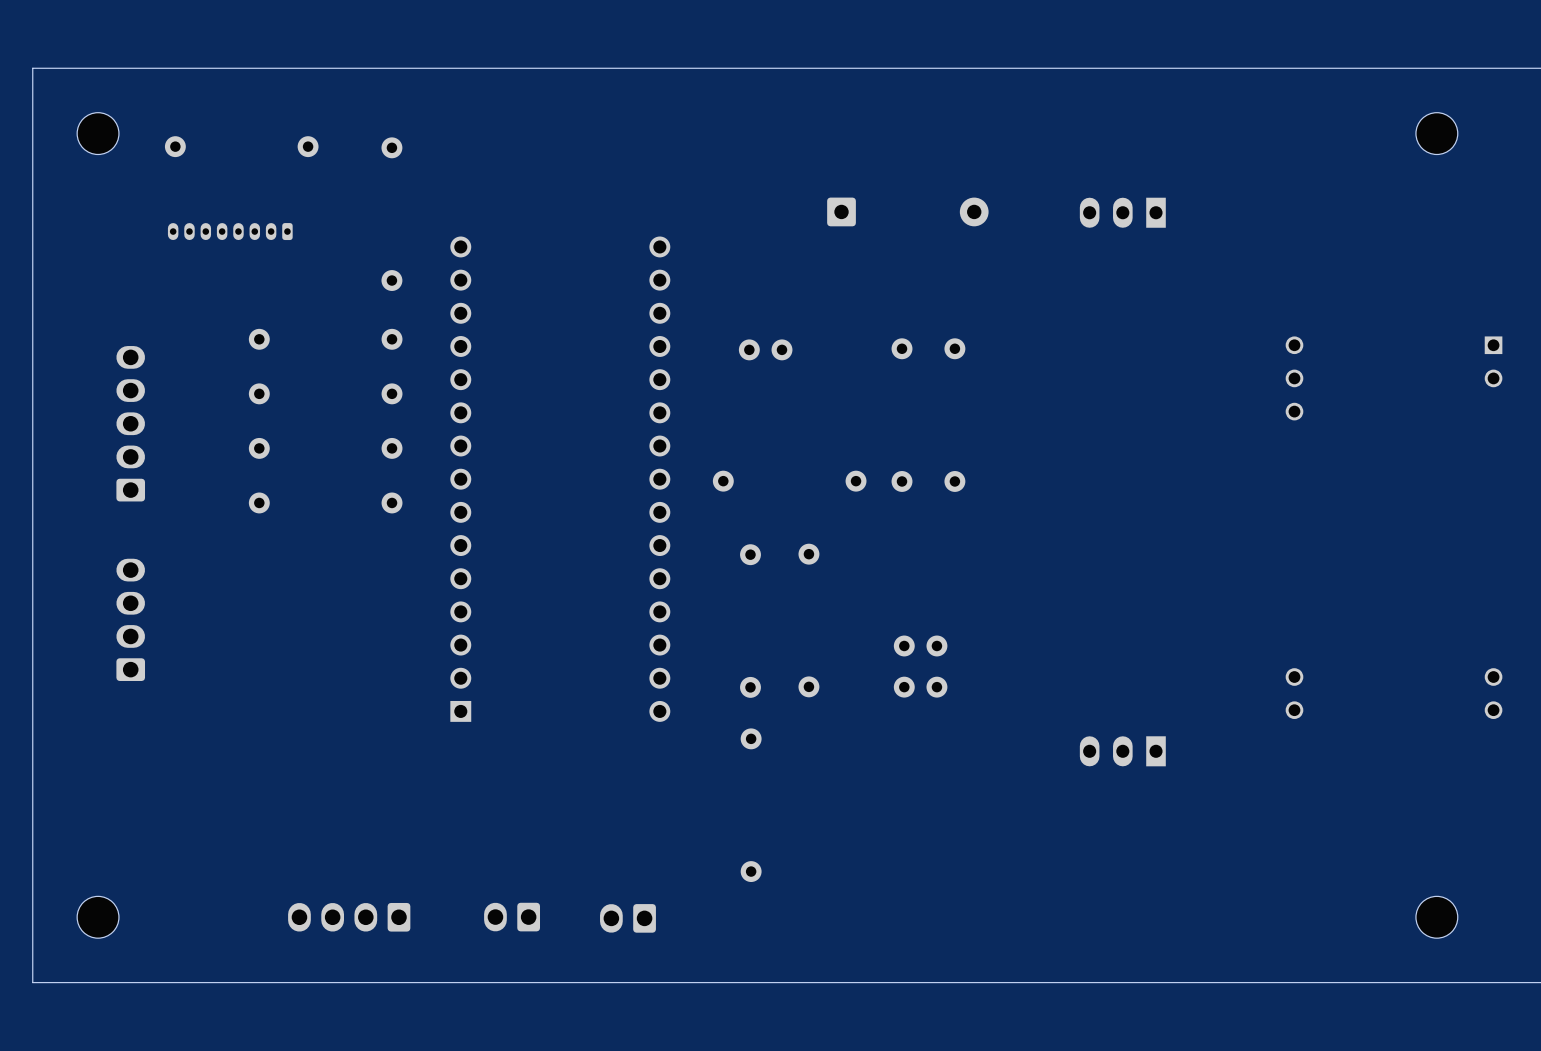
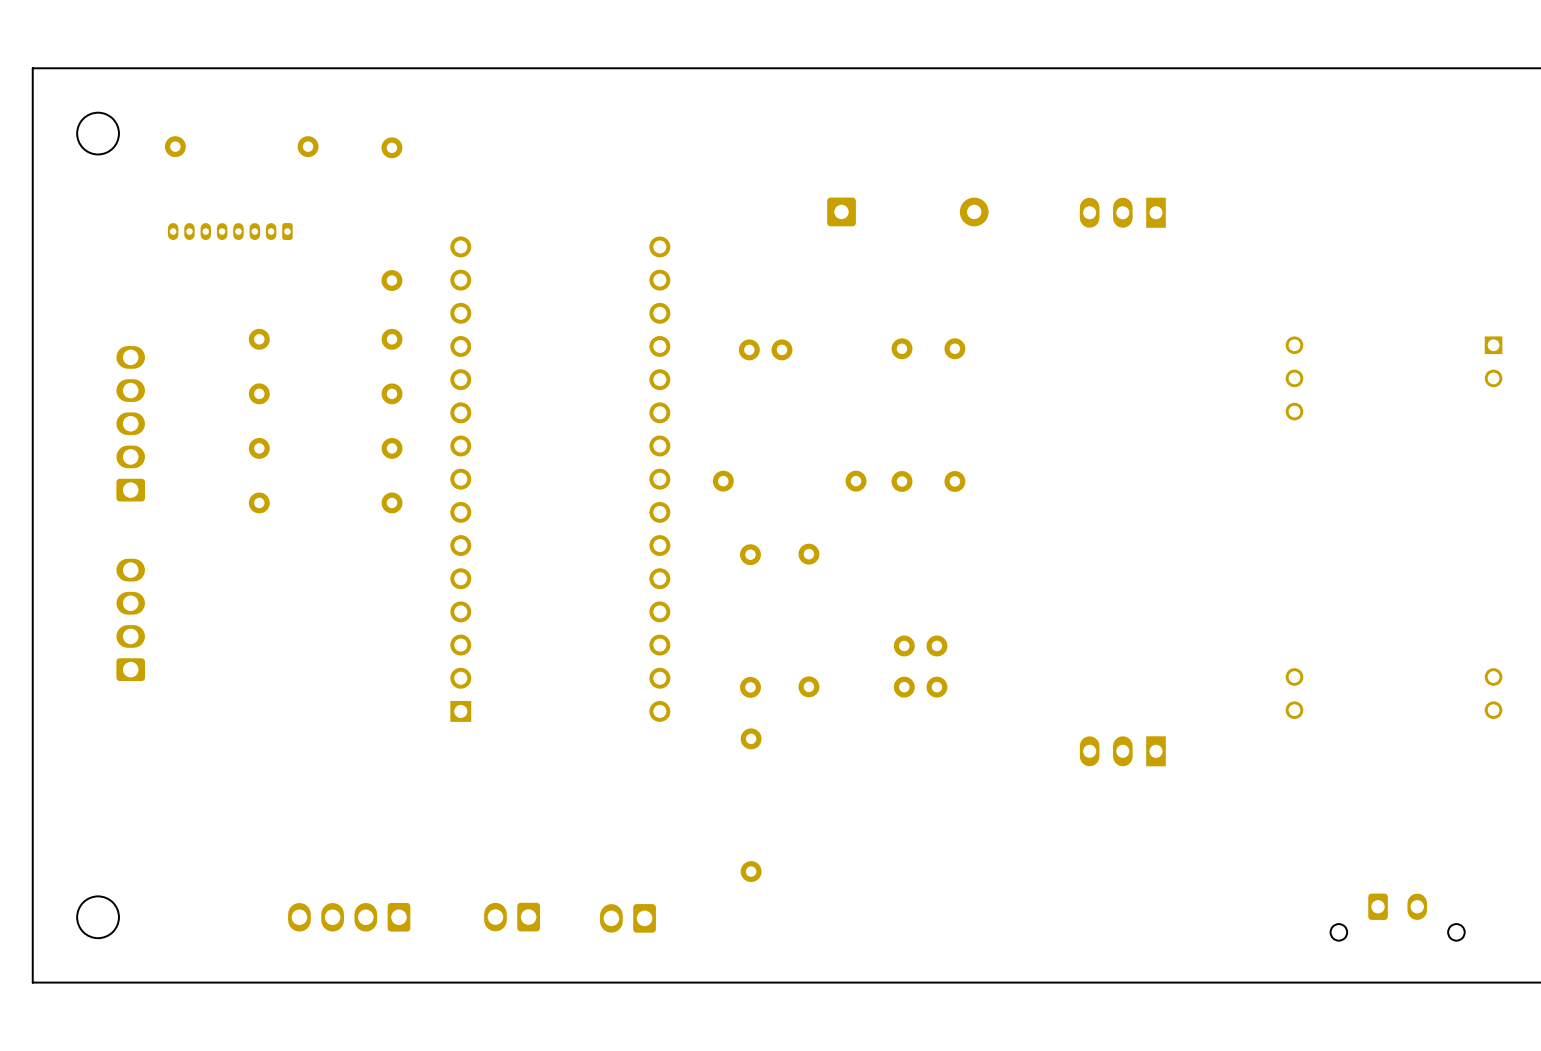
part: (1436, 133) -> none
part: none -> (1397, 917)
part: (1436, 917) -> none

